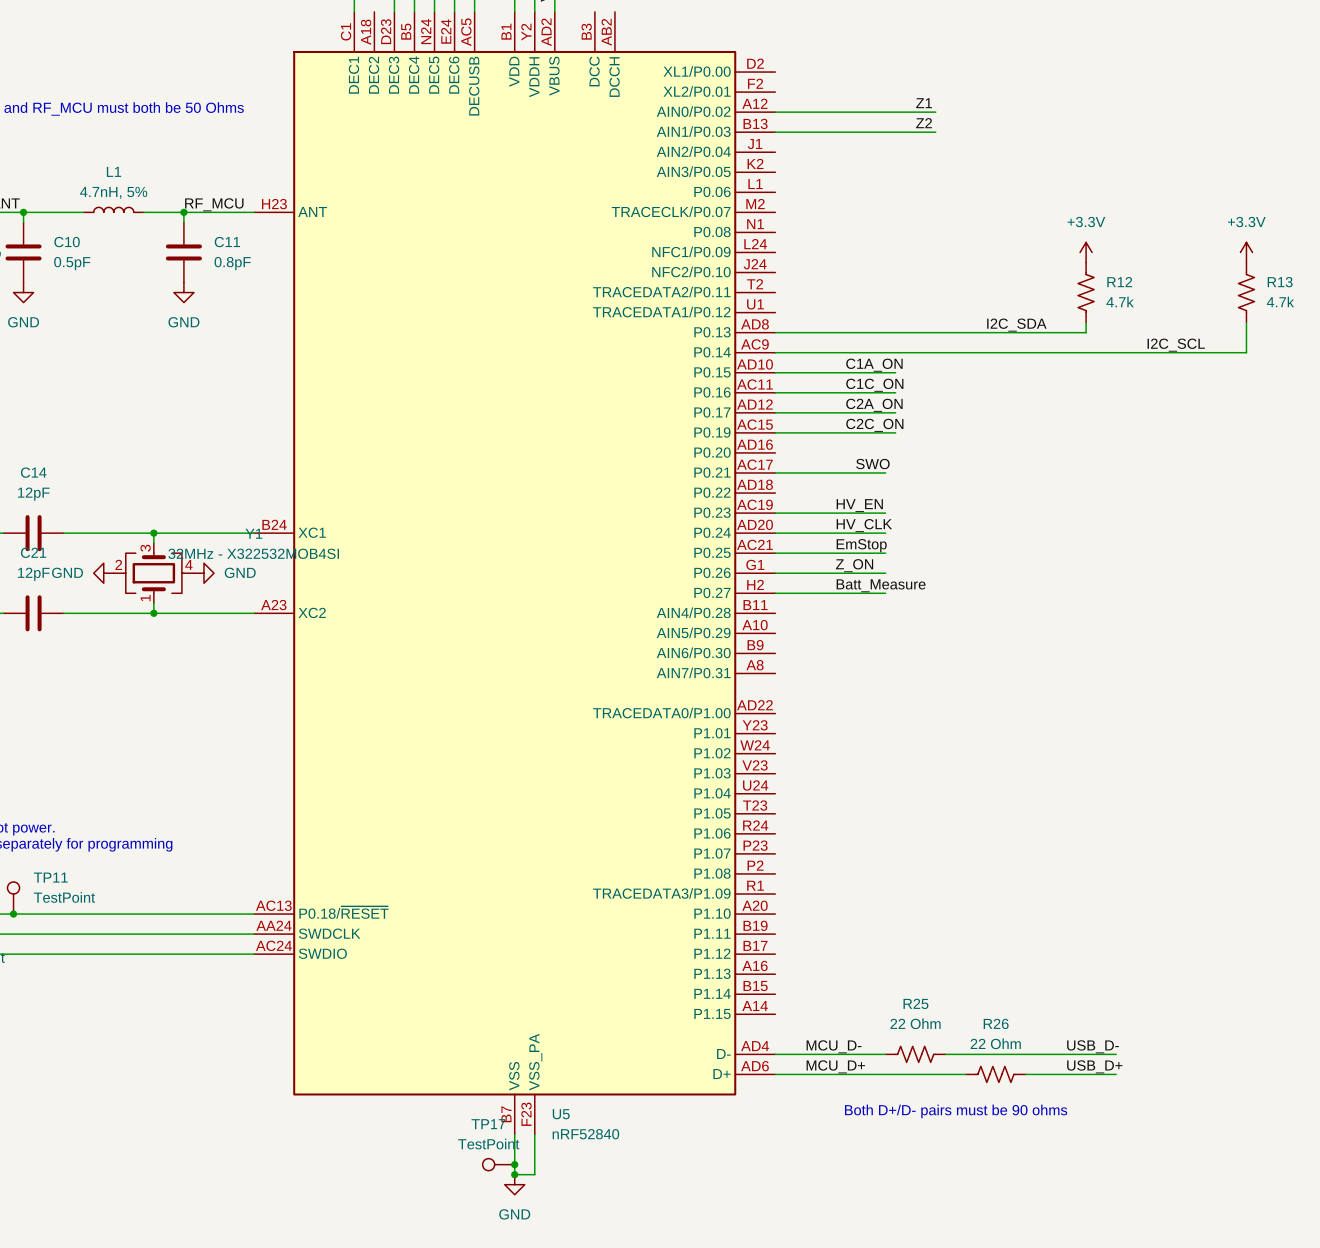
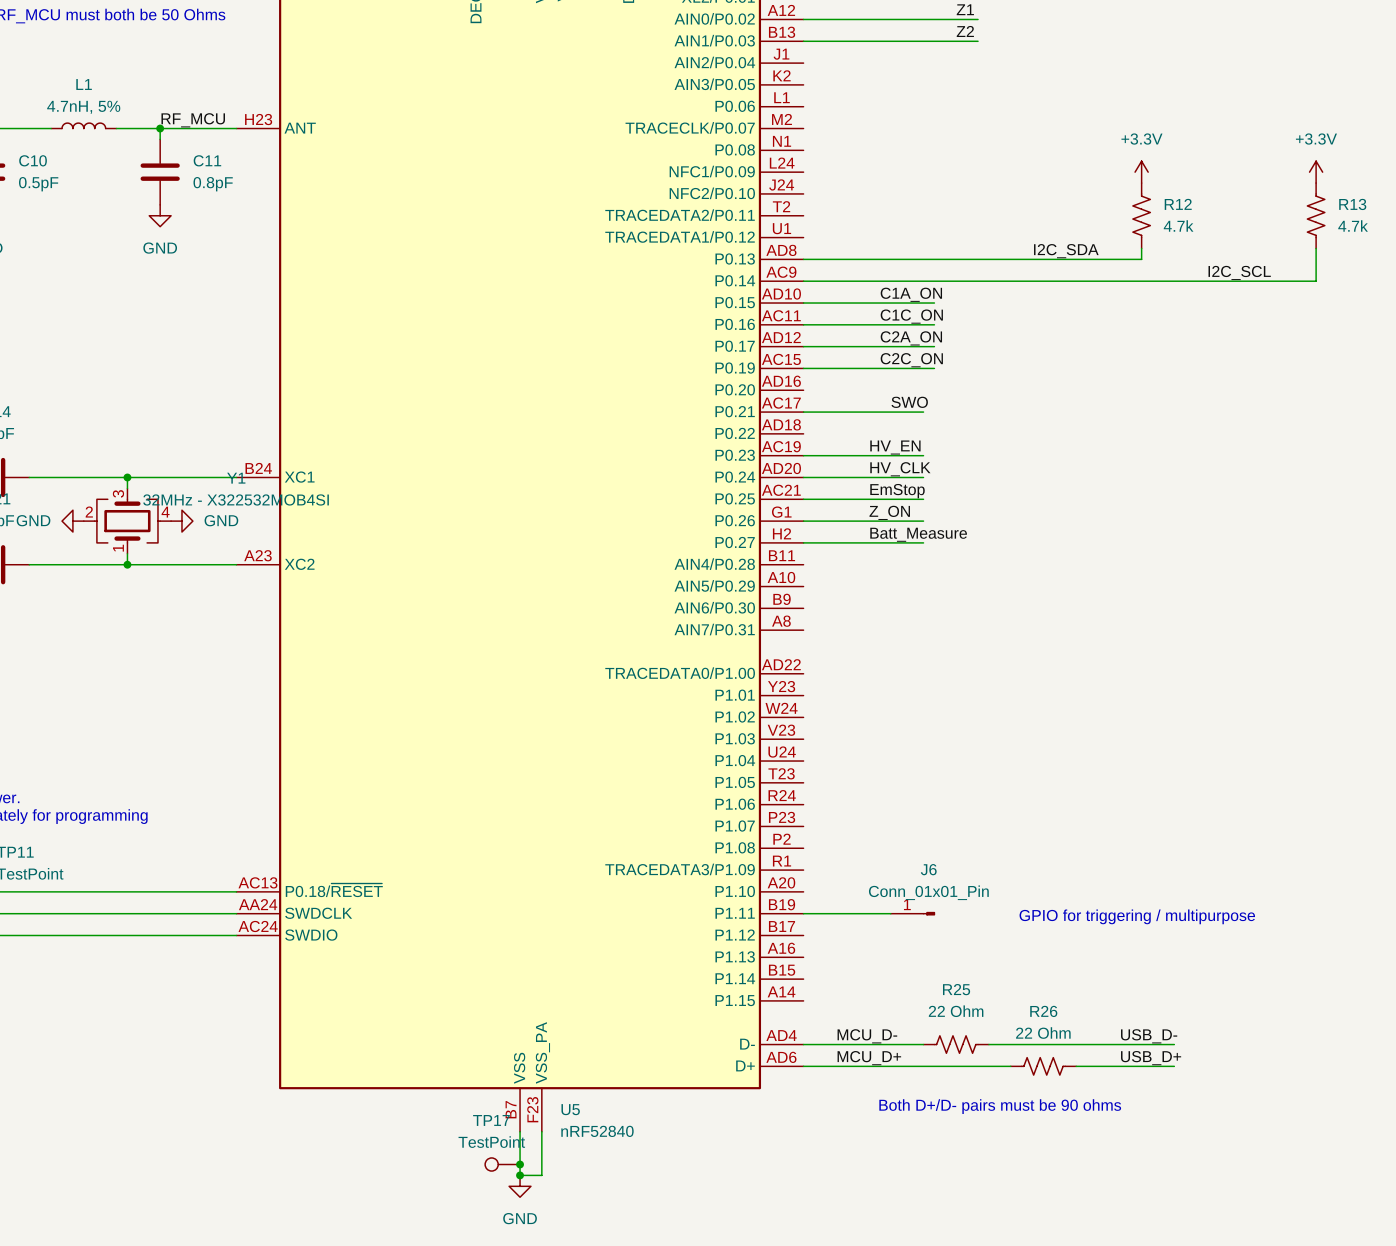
wire: none -> (803, 913) (890, 913)
J6: none -> Conn_01x01_Pin (912, 913)
text: none -> GPIO for triggering / multipurpose (1137, 916)

